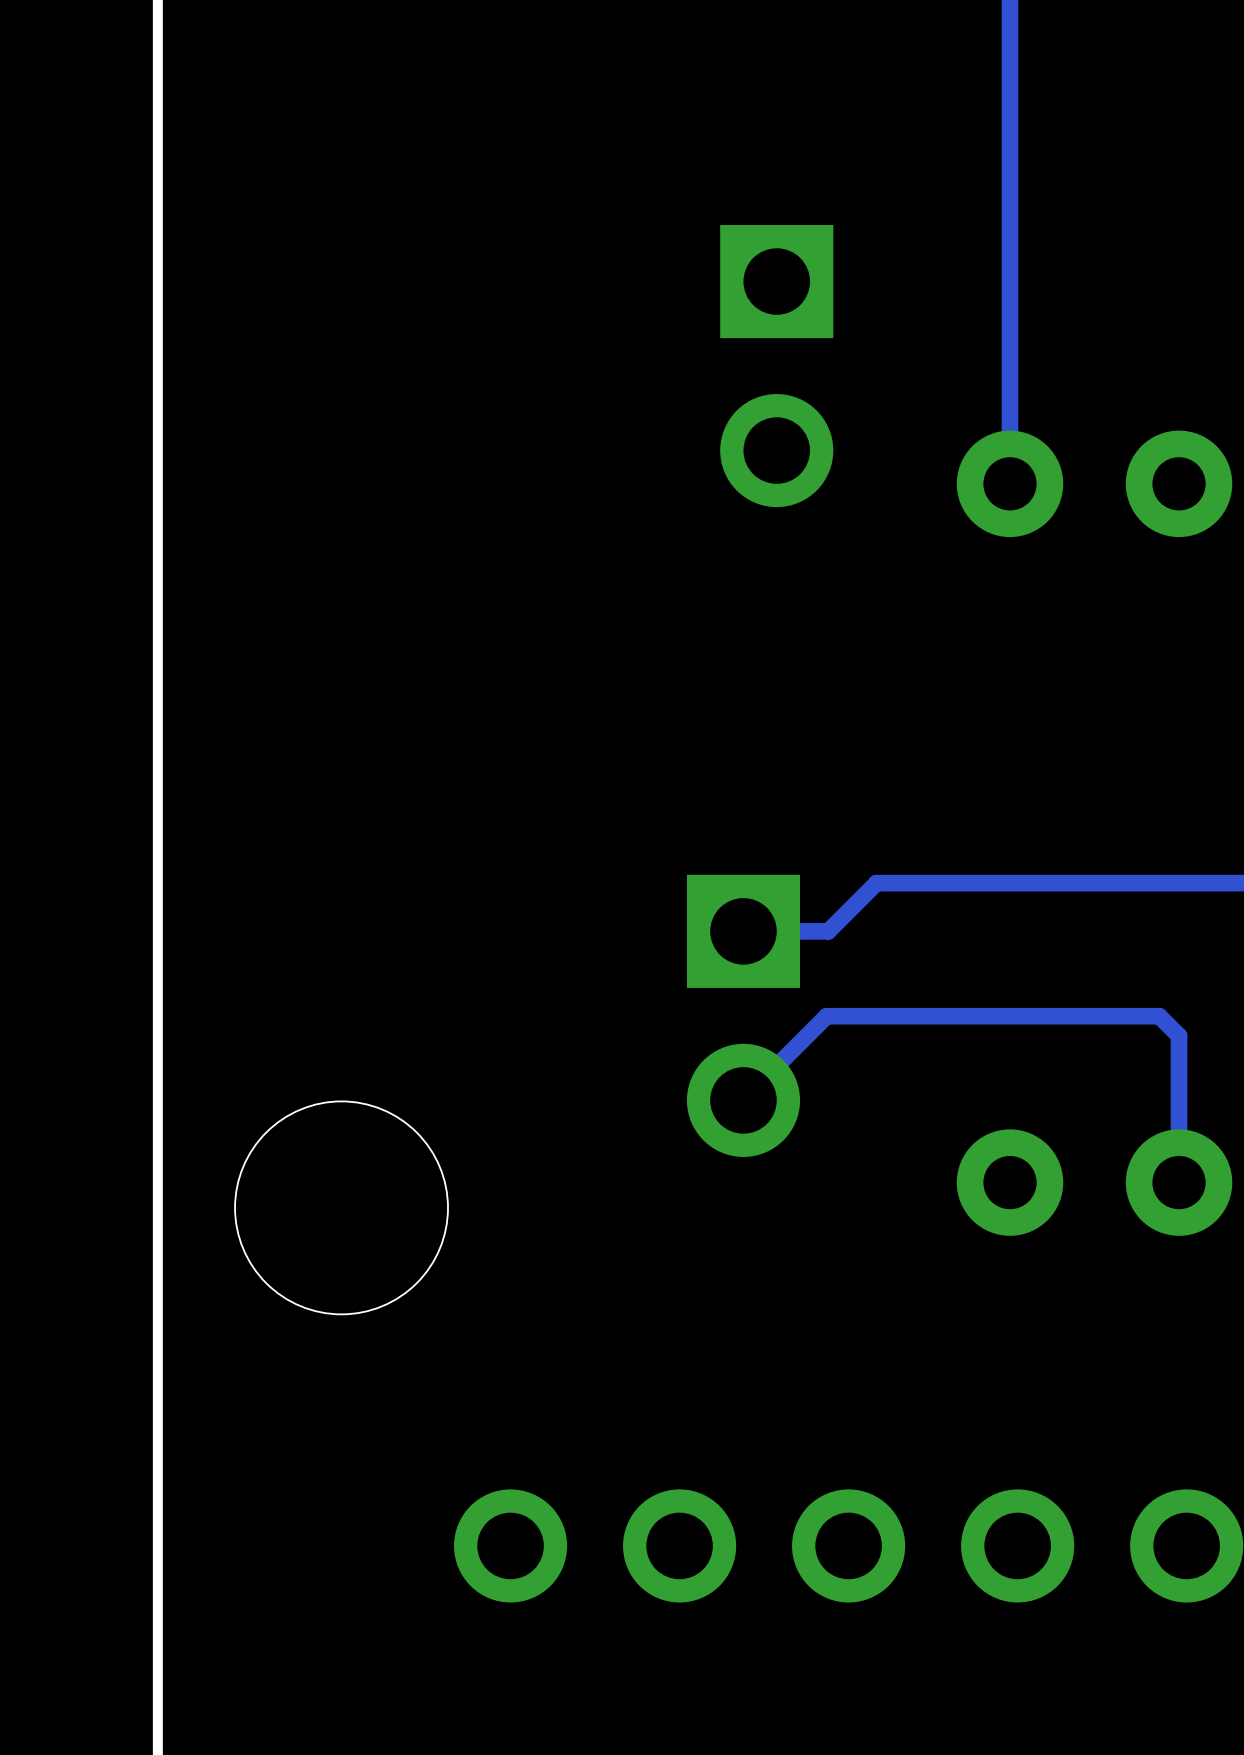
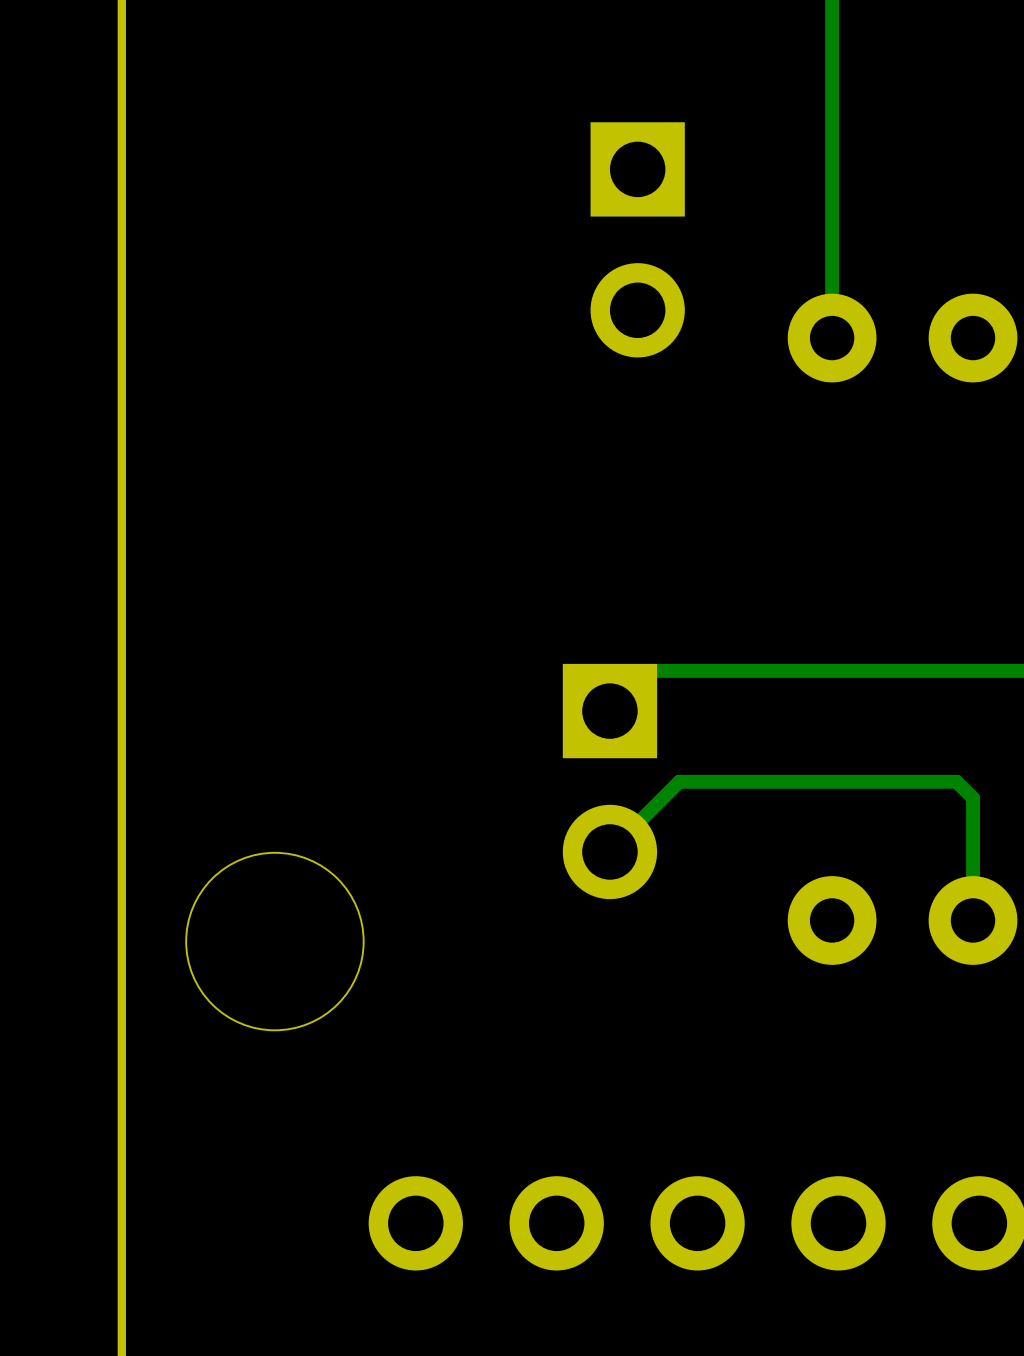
track: (876, 883) (828, 931) (743, 931) -> (720, 670) (650, 670) (609, 711)

